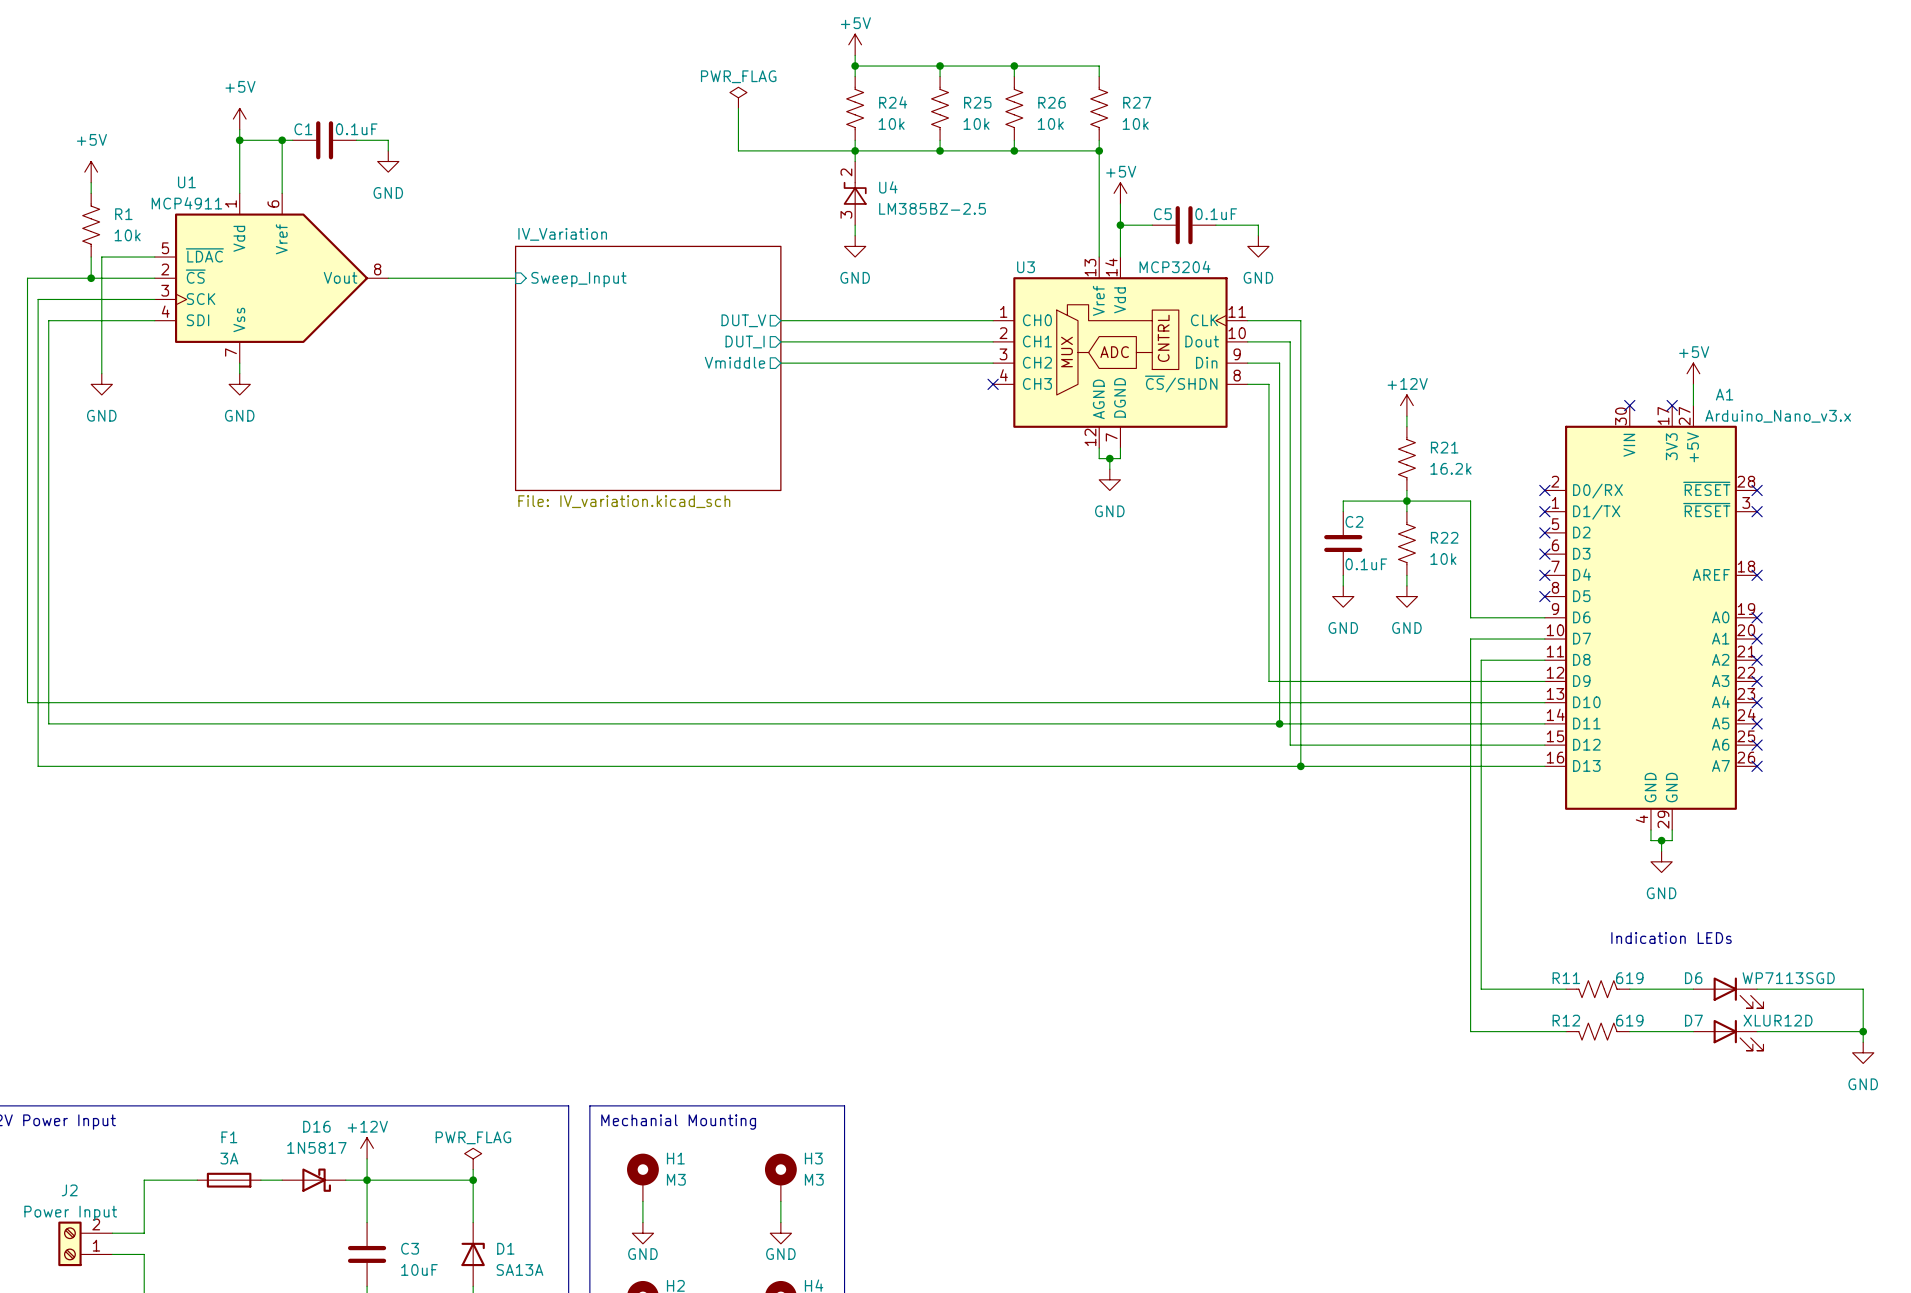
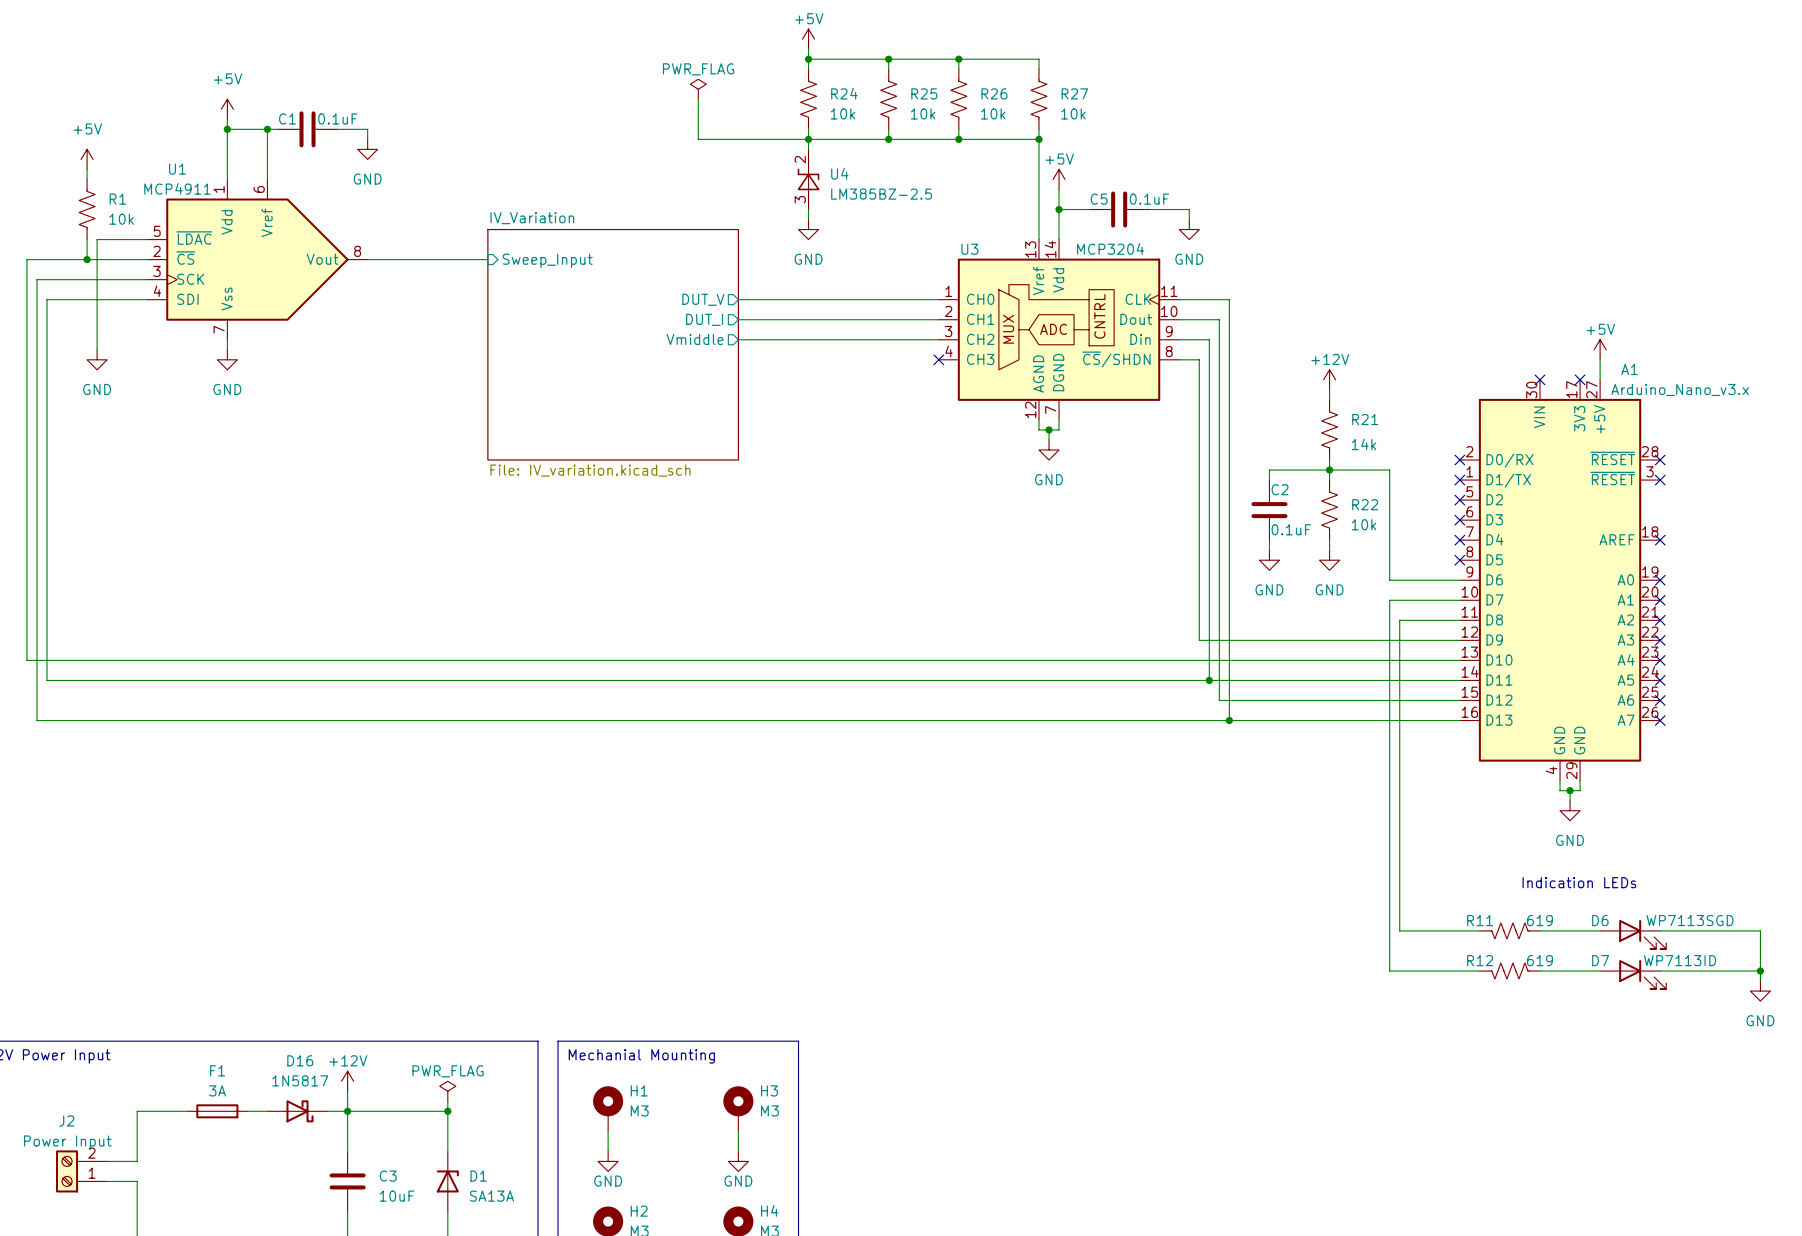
R21 value: 16.2k (1450, 468) -> 14k (1364, 444)
D7 value: XLUR12D (1778, 1020) -> WP7113ID (1680, 960)

